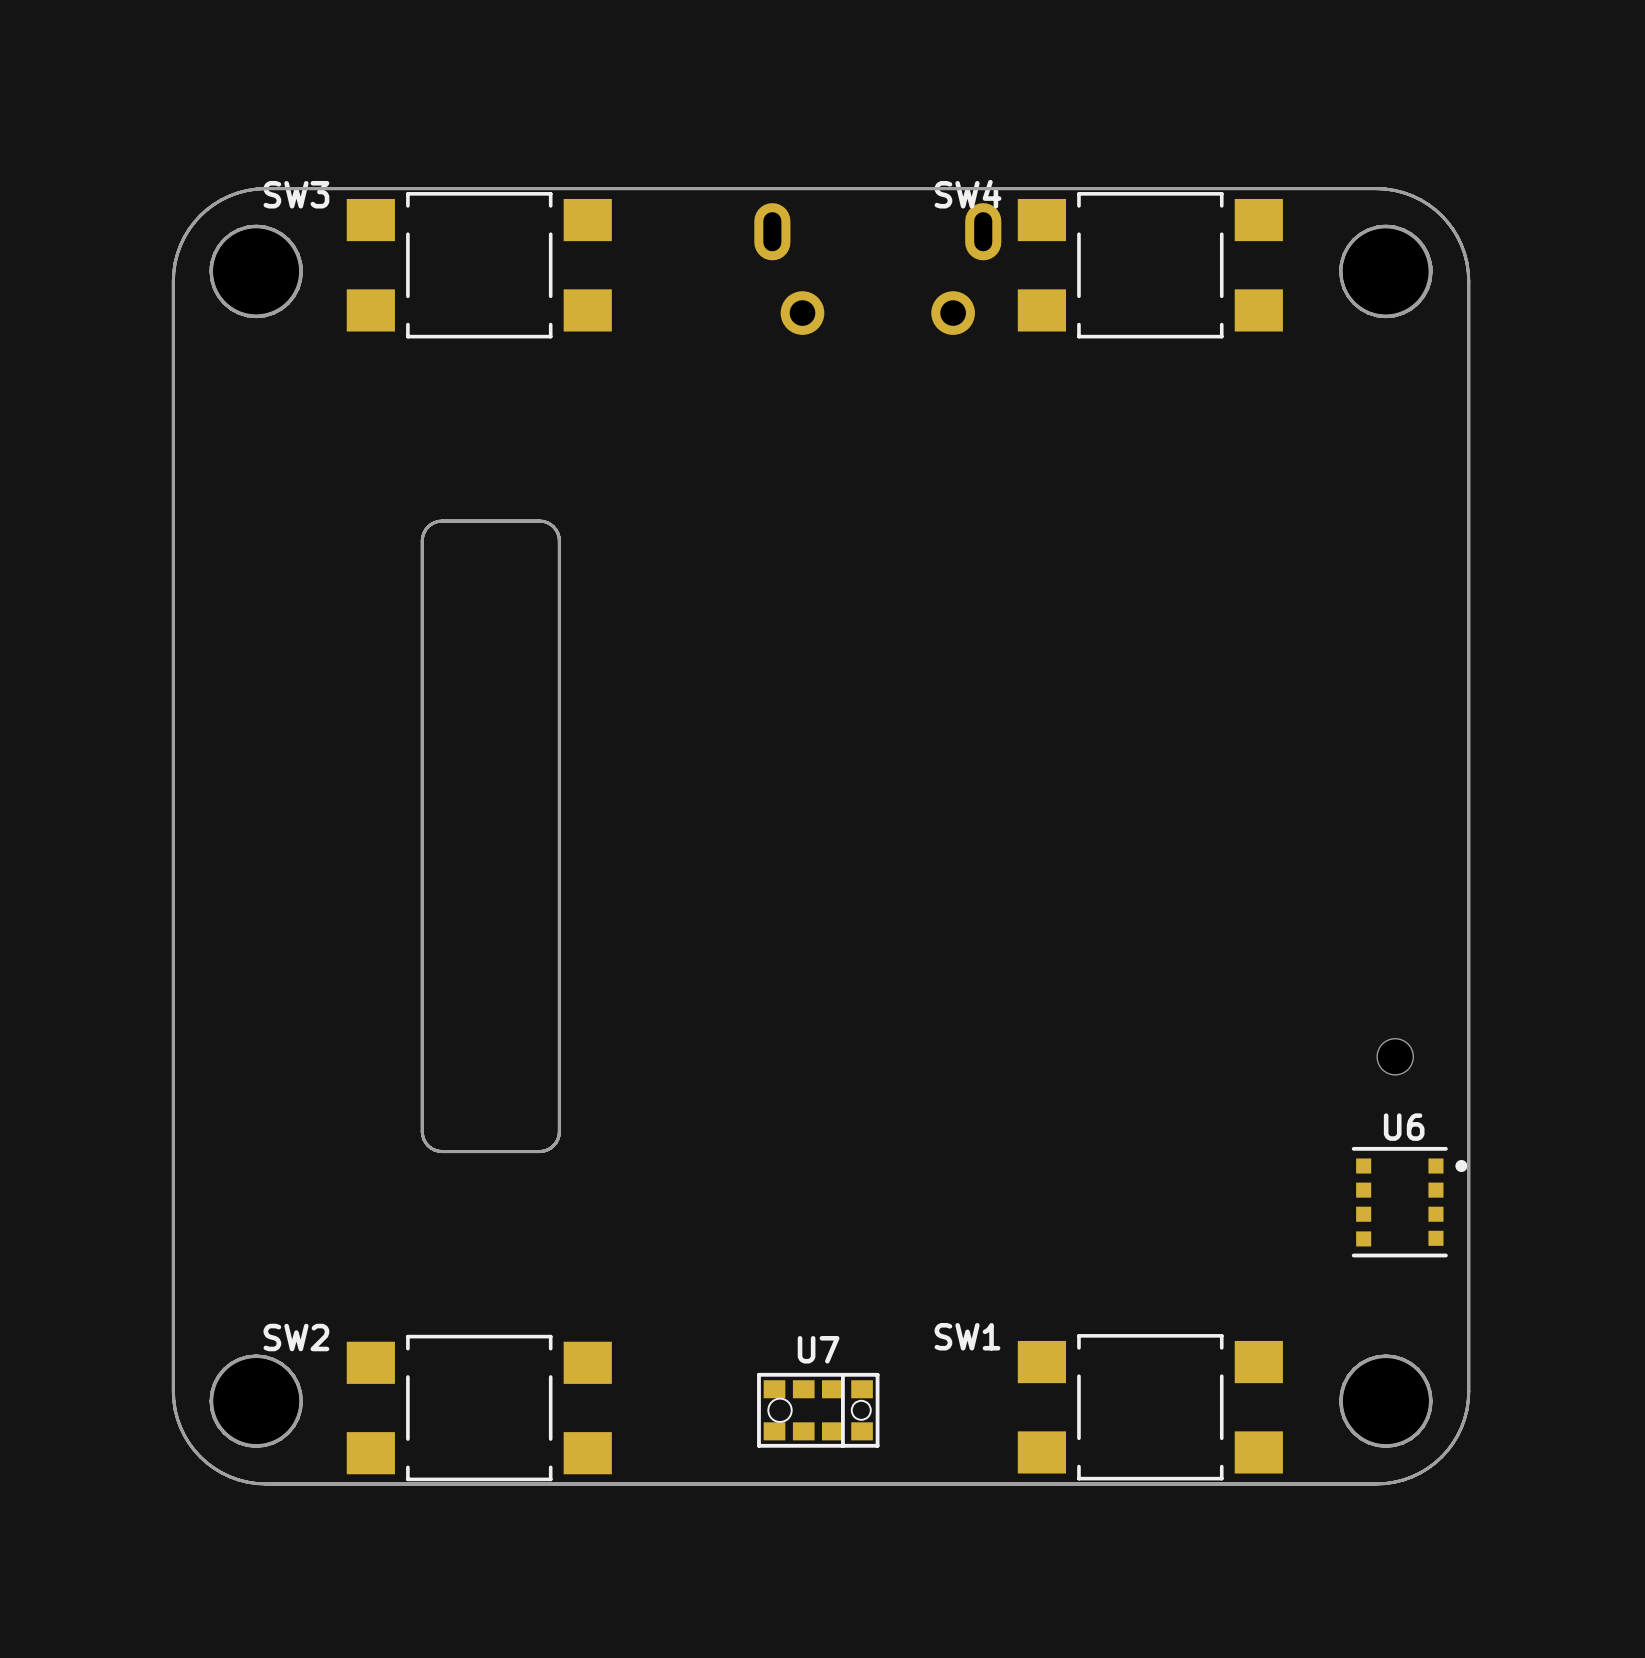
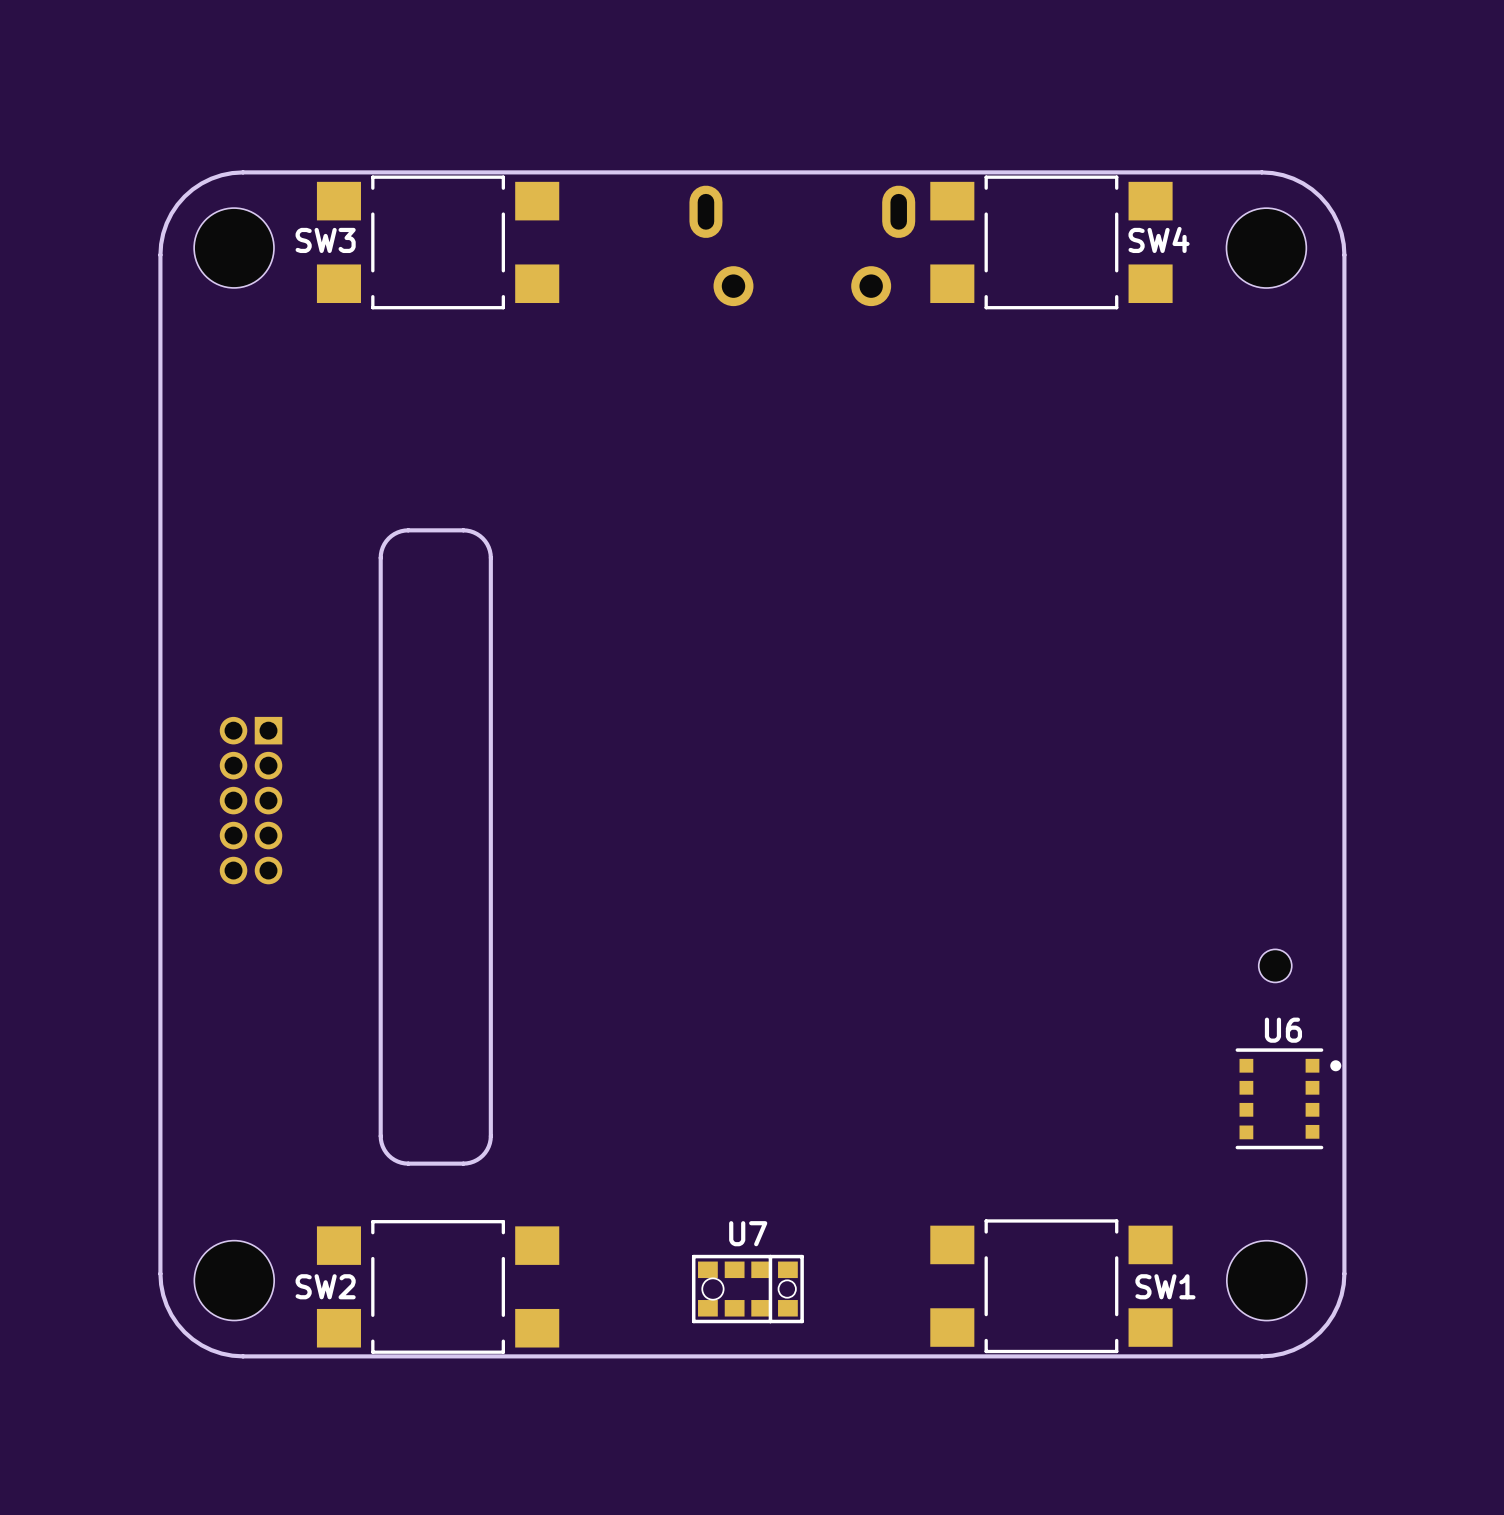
drawing: [171, 187, 1471, 1486] -> none
board edge: none -> (243, 172) (1261, 172) (1293, 178) (1320, 196) (1338, 223) (1344, 254) (1344, 1273) (1338, 1305) (1320, 1332) (1293, 1350) (1261, 1356) (243, 1356) (211, 1350) (184, 1332) (166, 1305) (160, 1273) (160, 254) (166, 223) (184, 196) (211, 178) (243, 172)
SW3 name position: SW3 (296, 194) -> SW3 (325, 240)
SW4 name position: SW4 (968, 194) -> SW4 (1159, 239)
board edge: none -> (408, 530) (470, 531) (482, 538) (490, 554) (490, 1136) (488, 1146) (482, 1155) (466, 1163) (401, 1162) (388, 1155) (380, 1139) (380, 557) (382, 547) (388, 538) (397, 532) (408, 530)
part: none -> (251, 800)
SW1 name position: SW1 (967, 1336) -> SW1 (1165, 1286)
SW2 name position: SW2 (296, 1337) -> SW2 (325, 1286)

